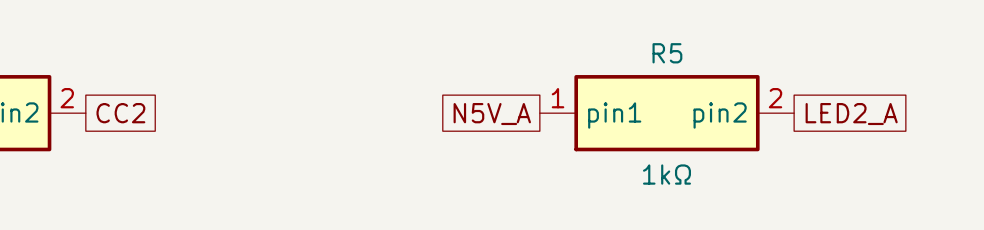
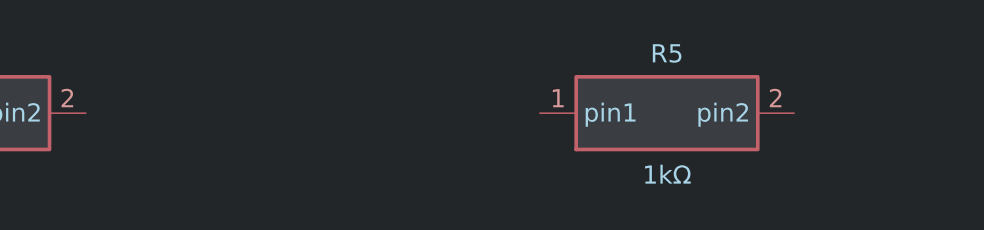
global label: CC2 (120, 113) -> none
global label: N5V_A (492, 114) -> none
global label: LED2_A (851, 114) -> none

